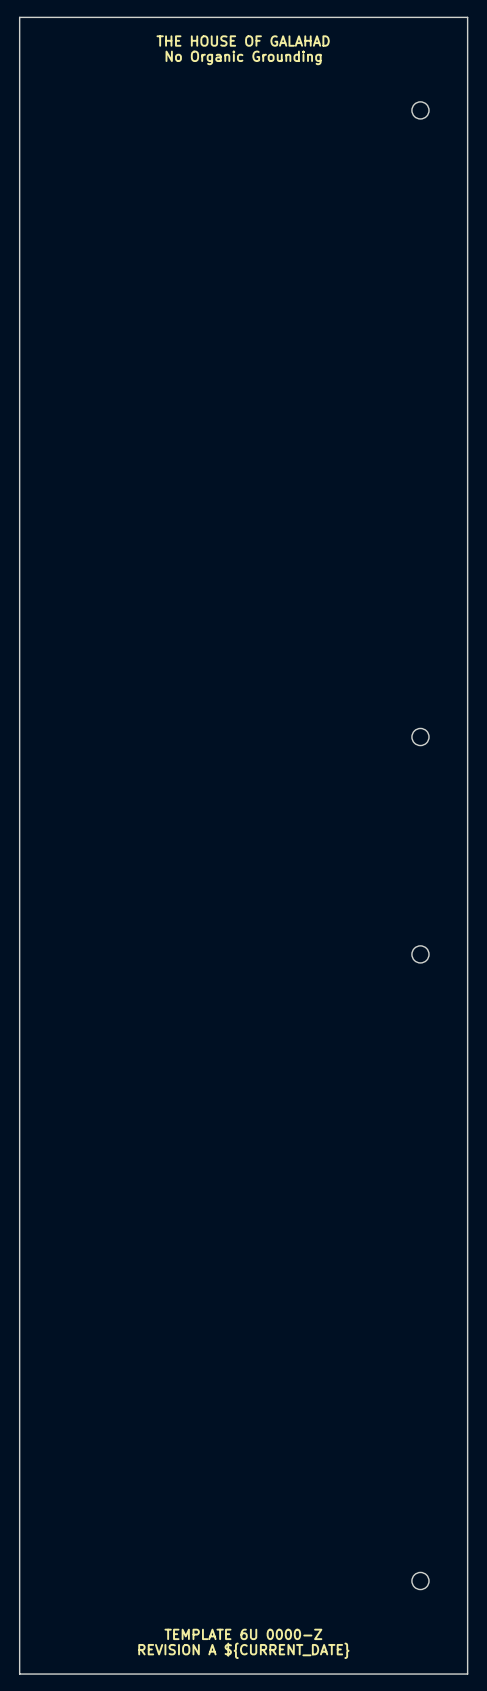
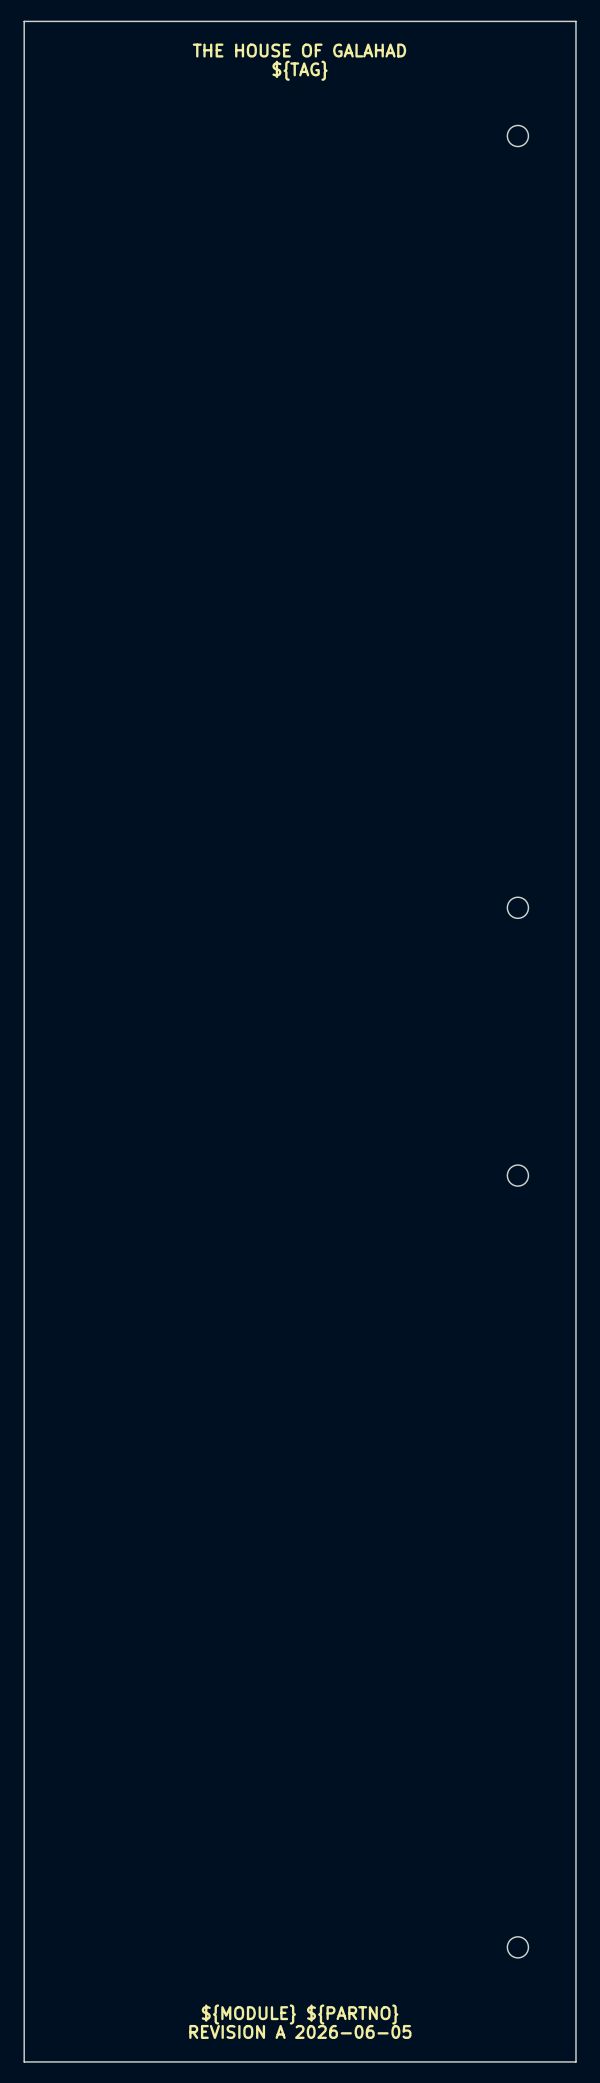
text: No Organic Grounding (243, 57) -> ${TAG} (300, 70)
text: TEMPLATE 6U 0000-Z (243, 1634) -> ${MODULE} ${PARTNO} (300, 2014)
text: REVISION A ${CURRENT_DATE} (243, 1650) -> REVISION A 2026-06-05 (300, 2031)

